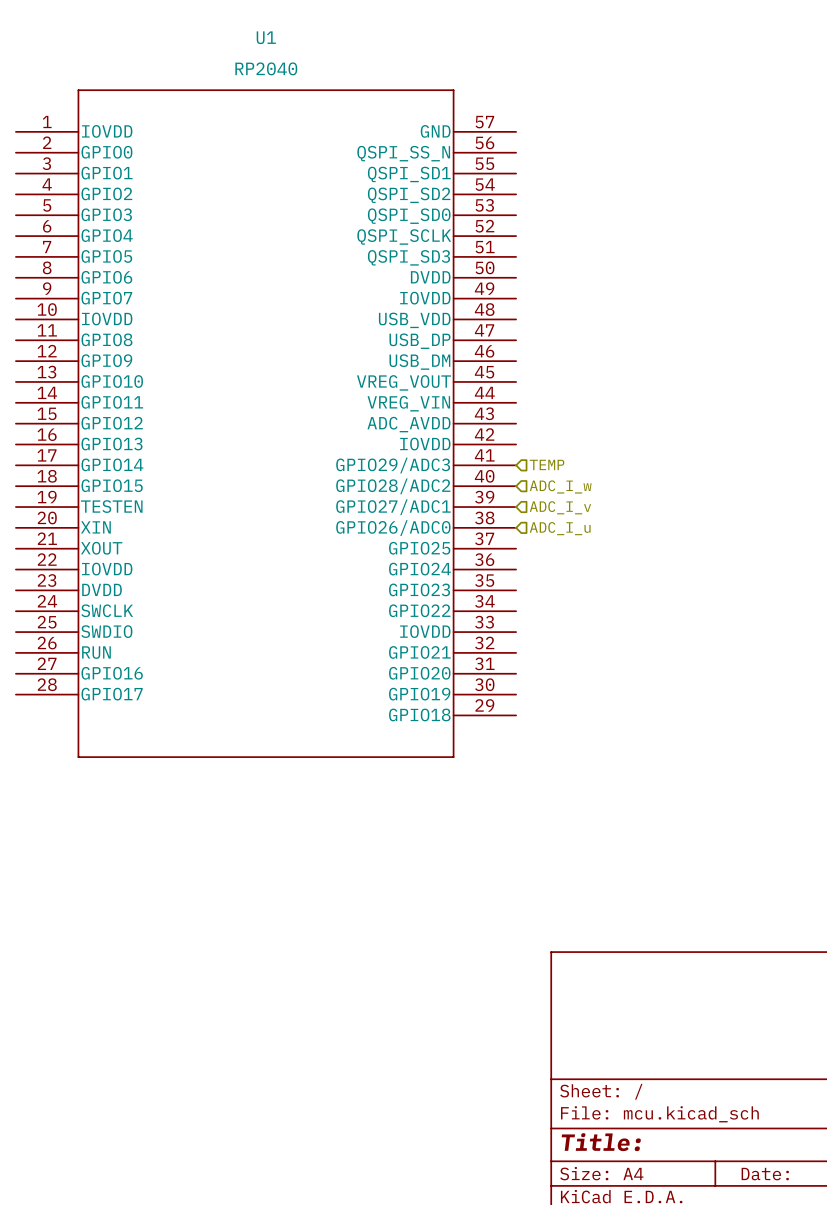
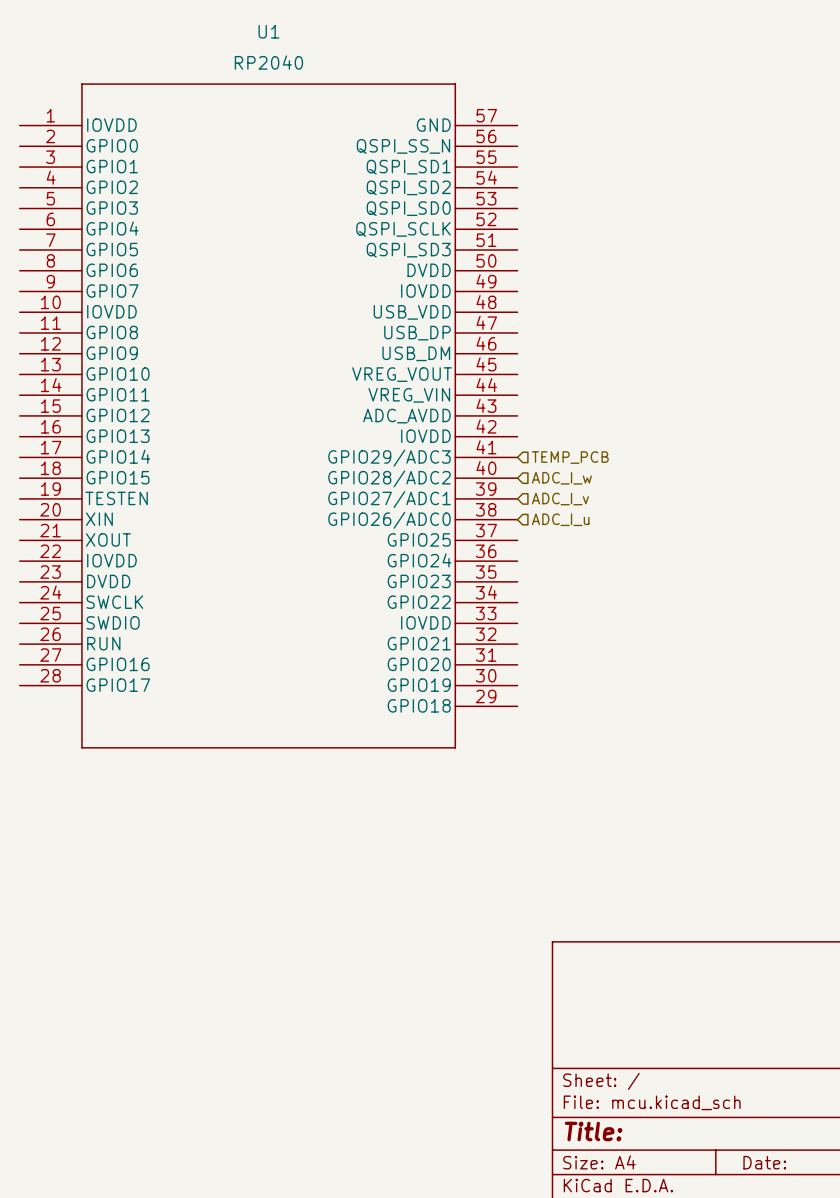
hierarchical label: TEMP (547, 464) -> TEMP_PCB (570, 457)

